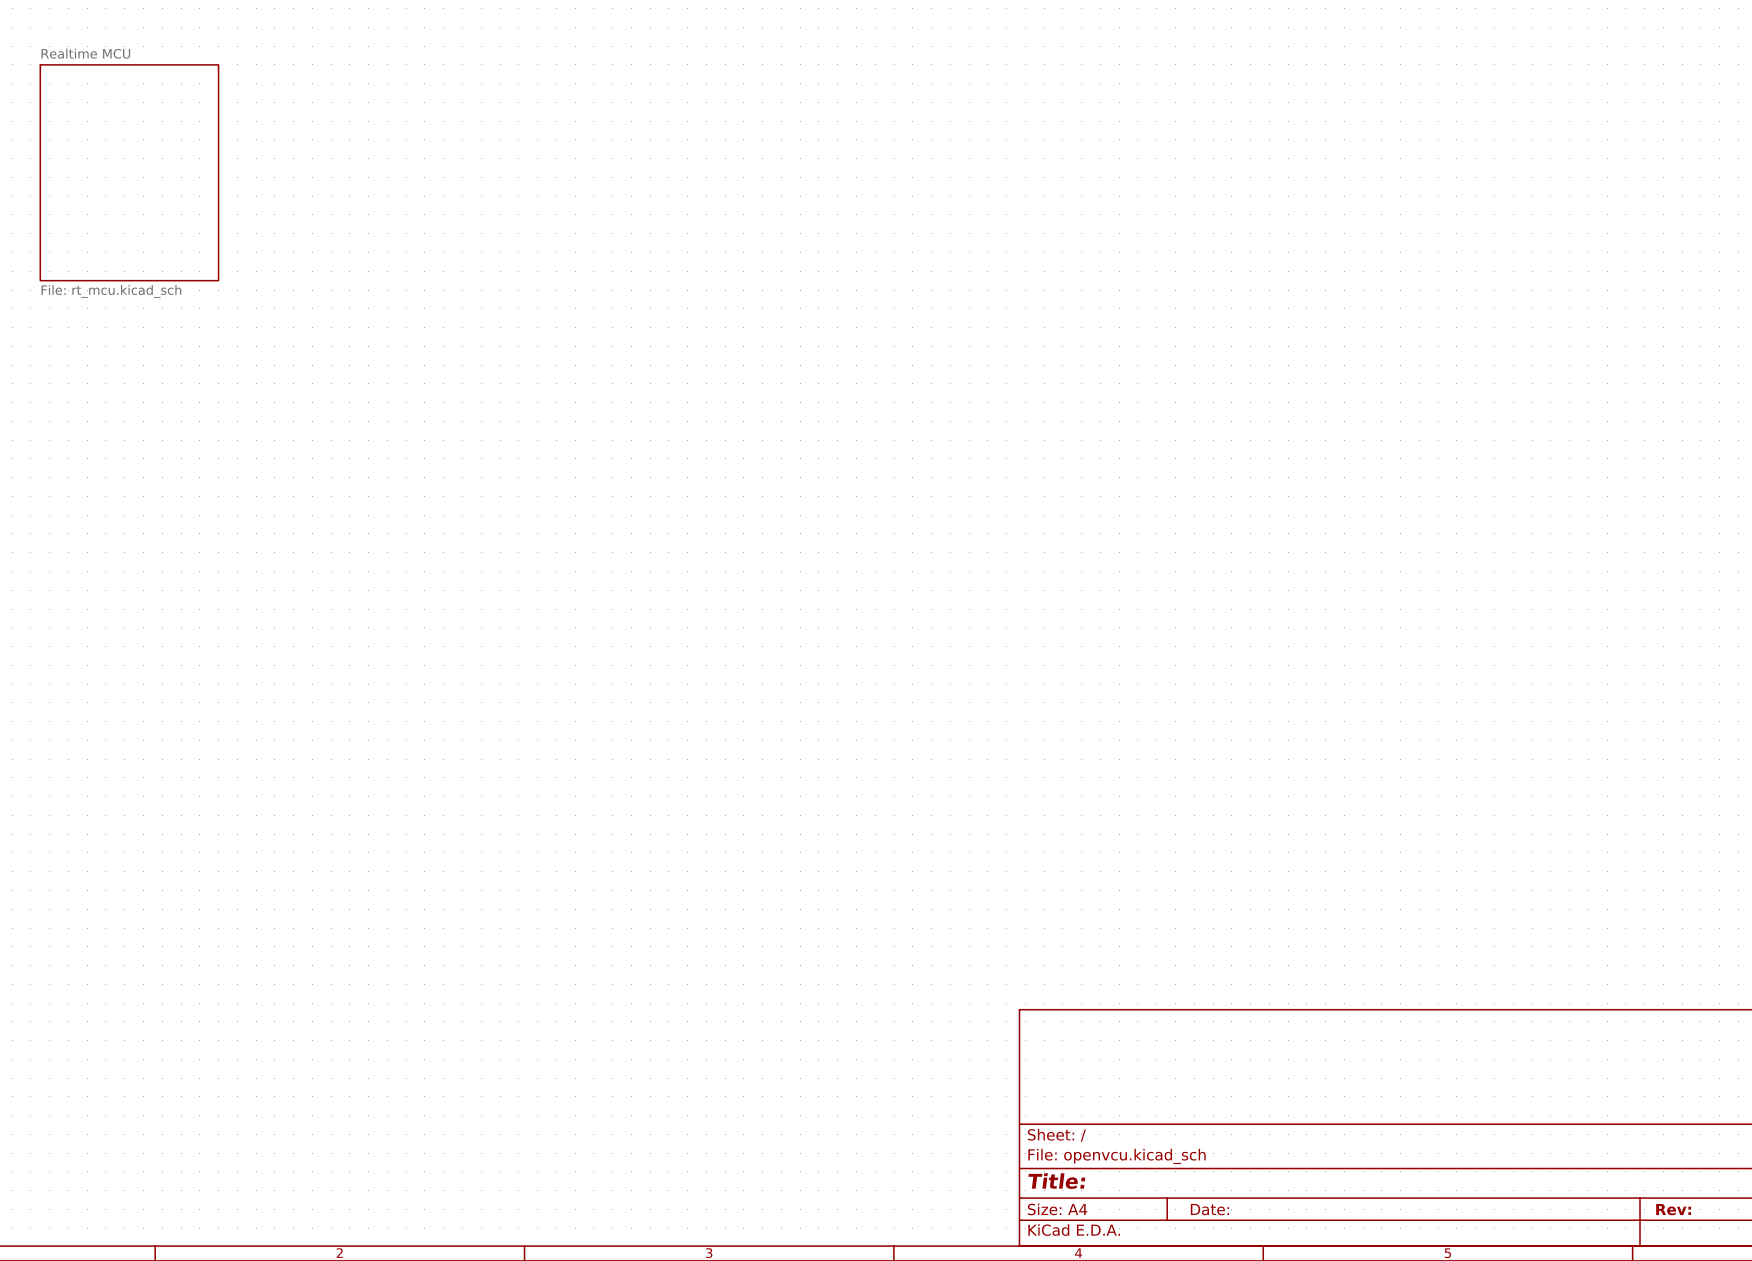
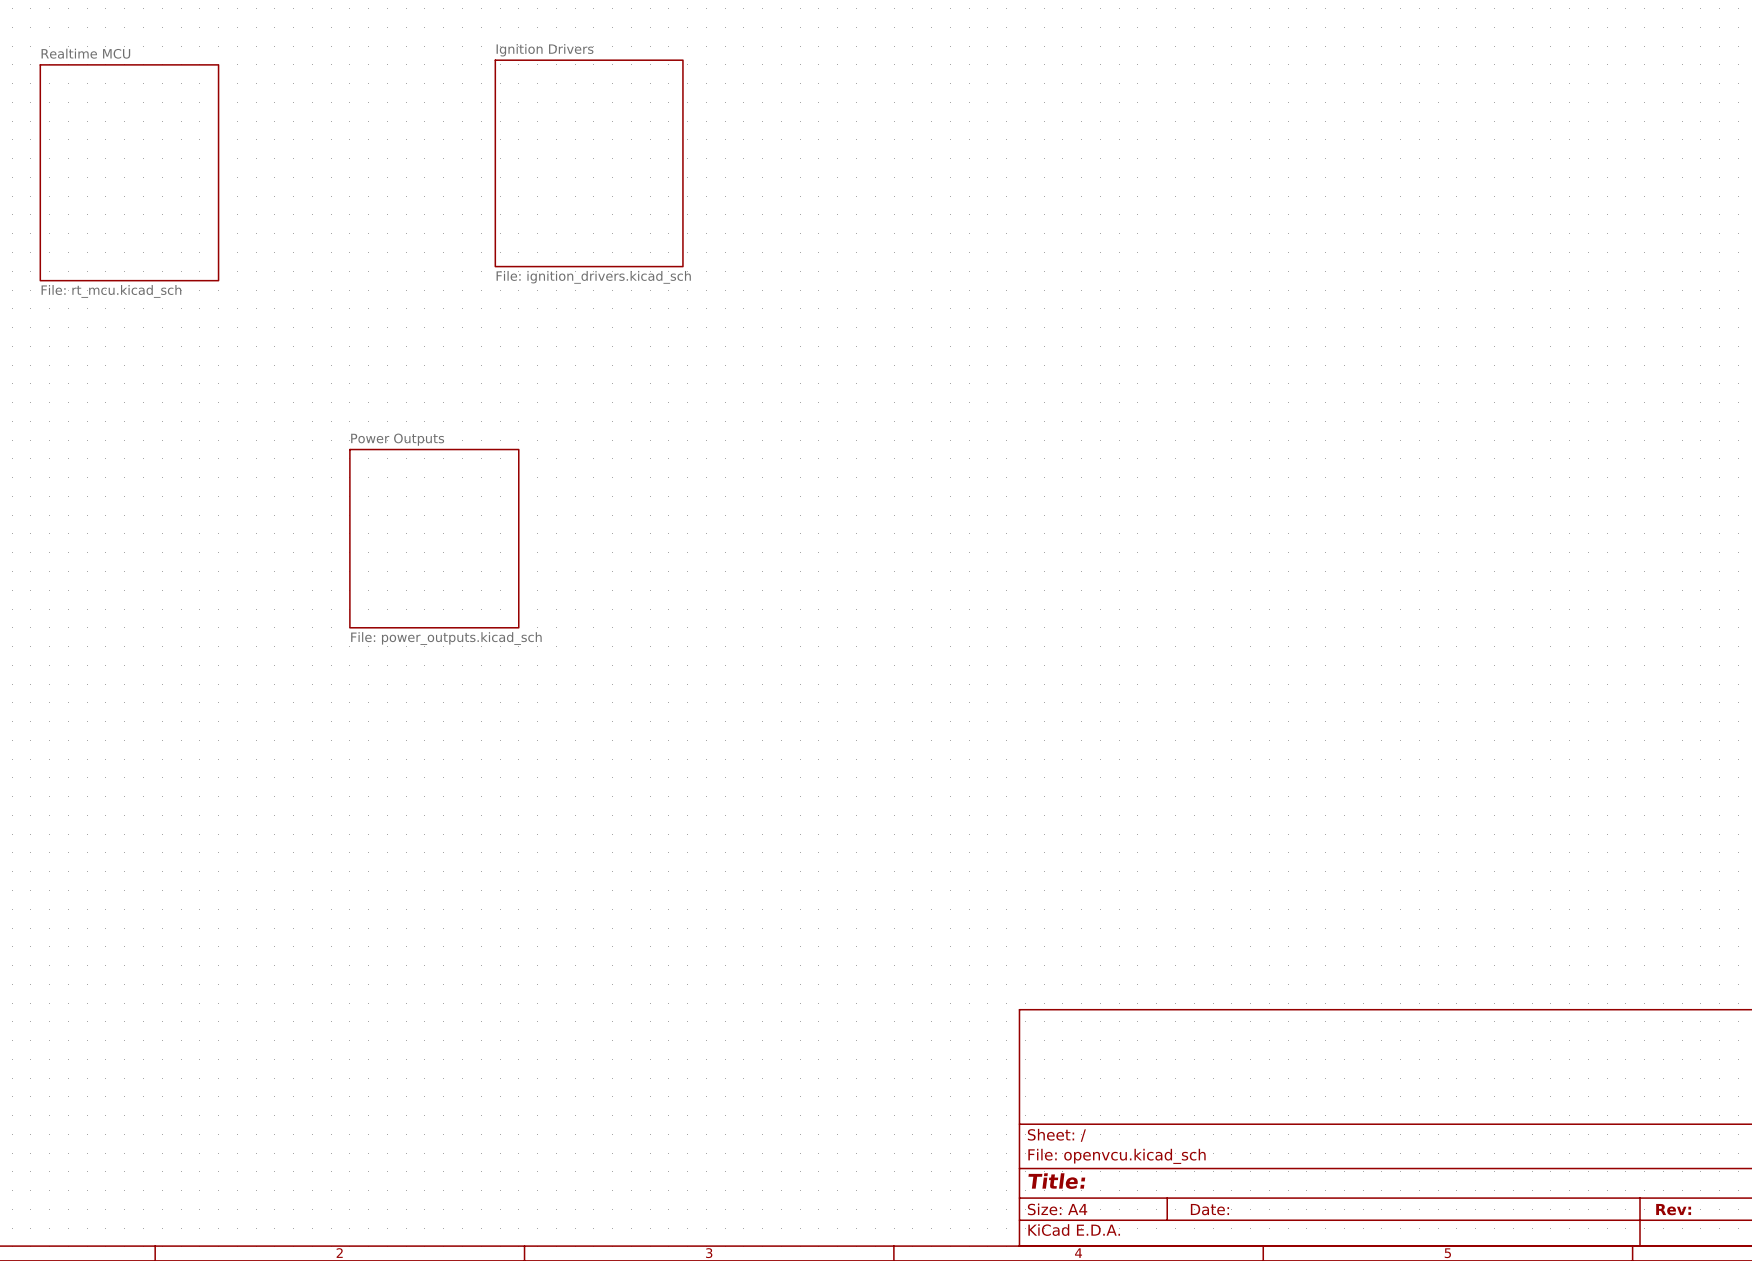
sheet Ignition Drivers: none -> File: ignition_drivers.kicad_sch (589, 163)
sheet Power Outputs: none -> File: power_outputs.kicad_sch (434, 538)

